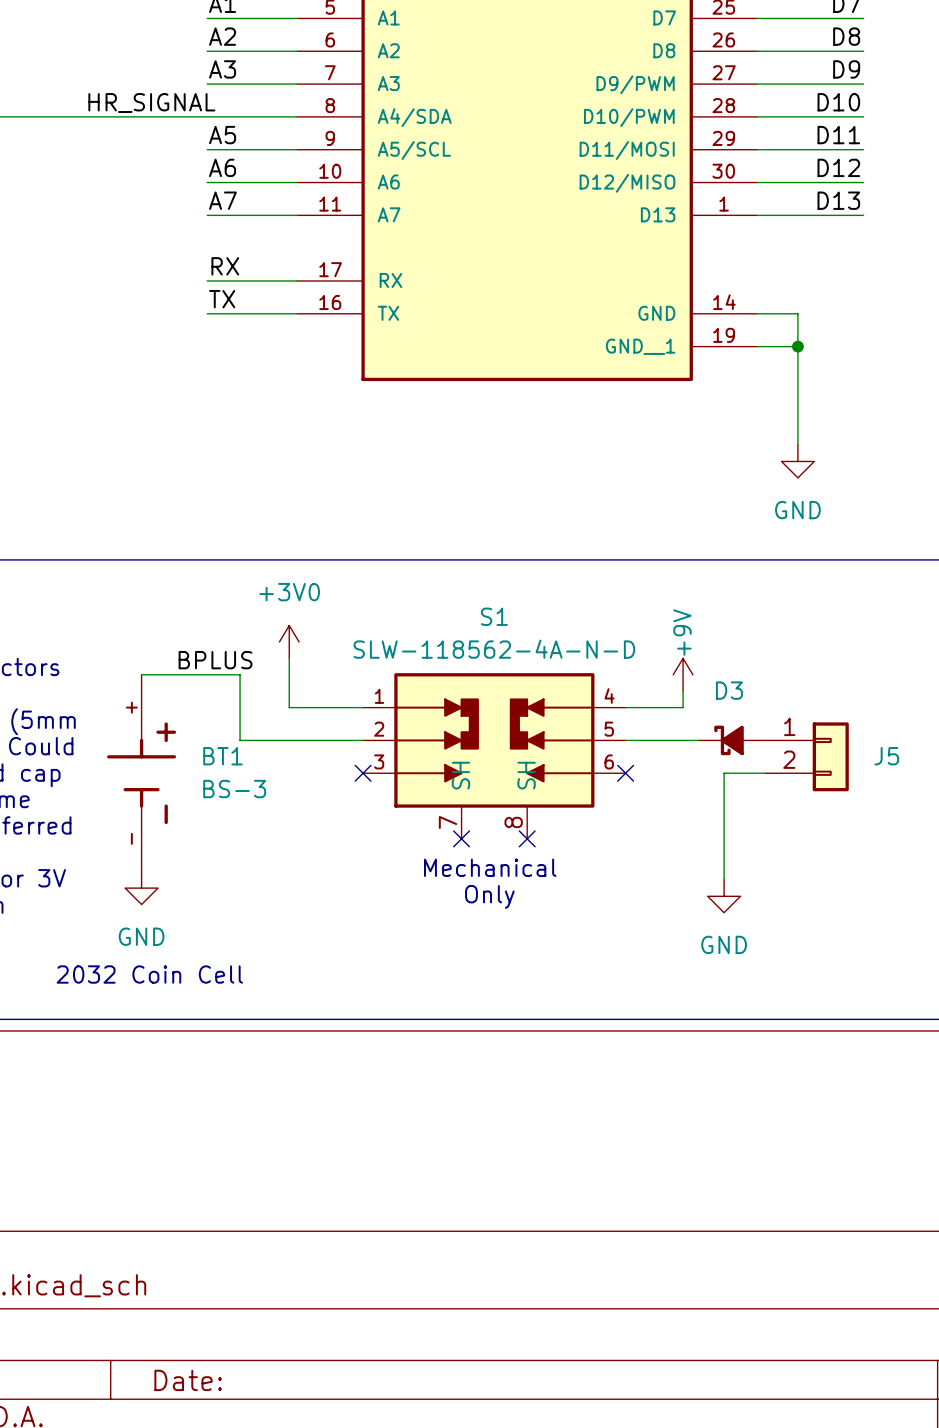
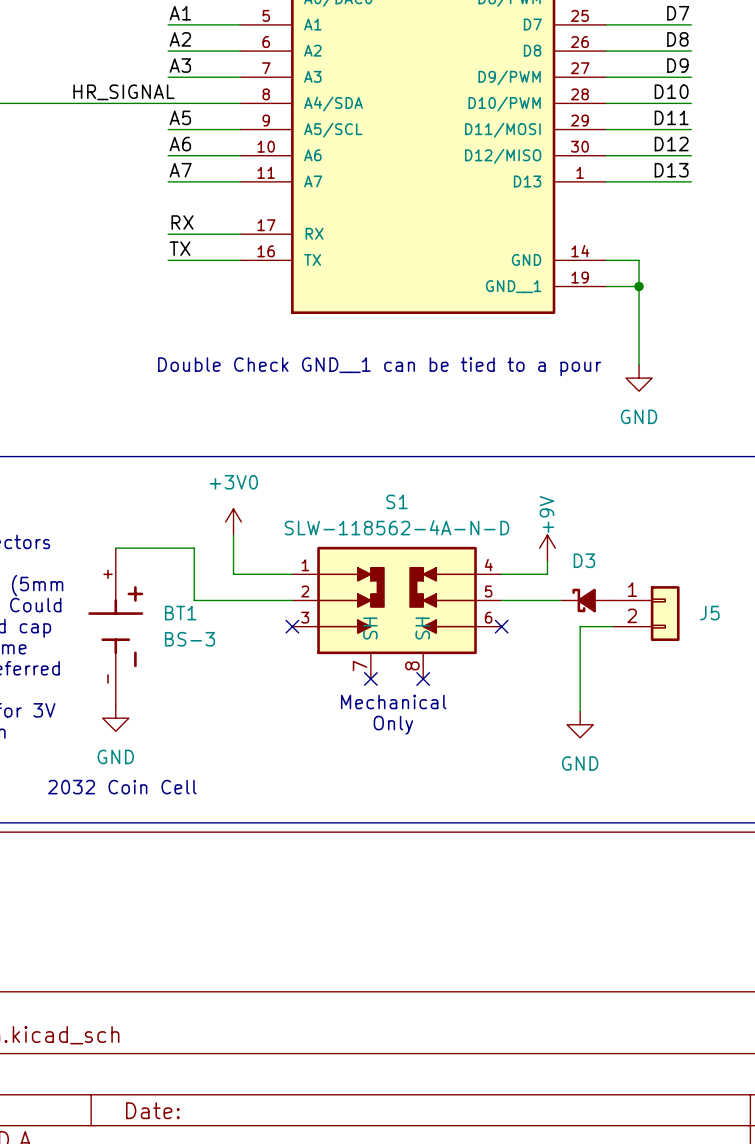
text: none -> Double Check GND__1 can be tied to a pour (379, 366)
label: BPLUS (215, 660) -> none

